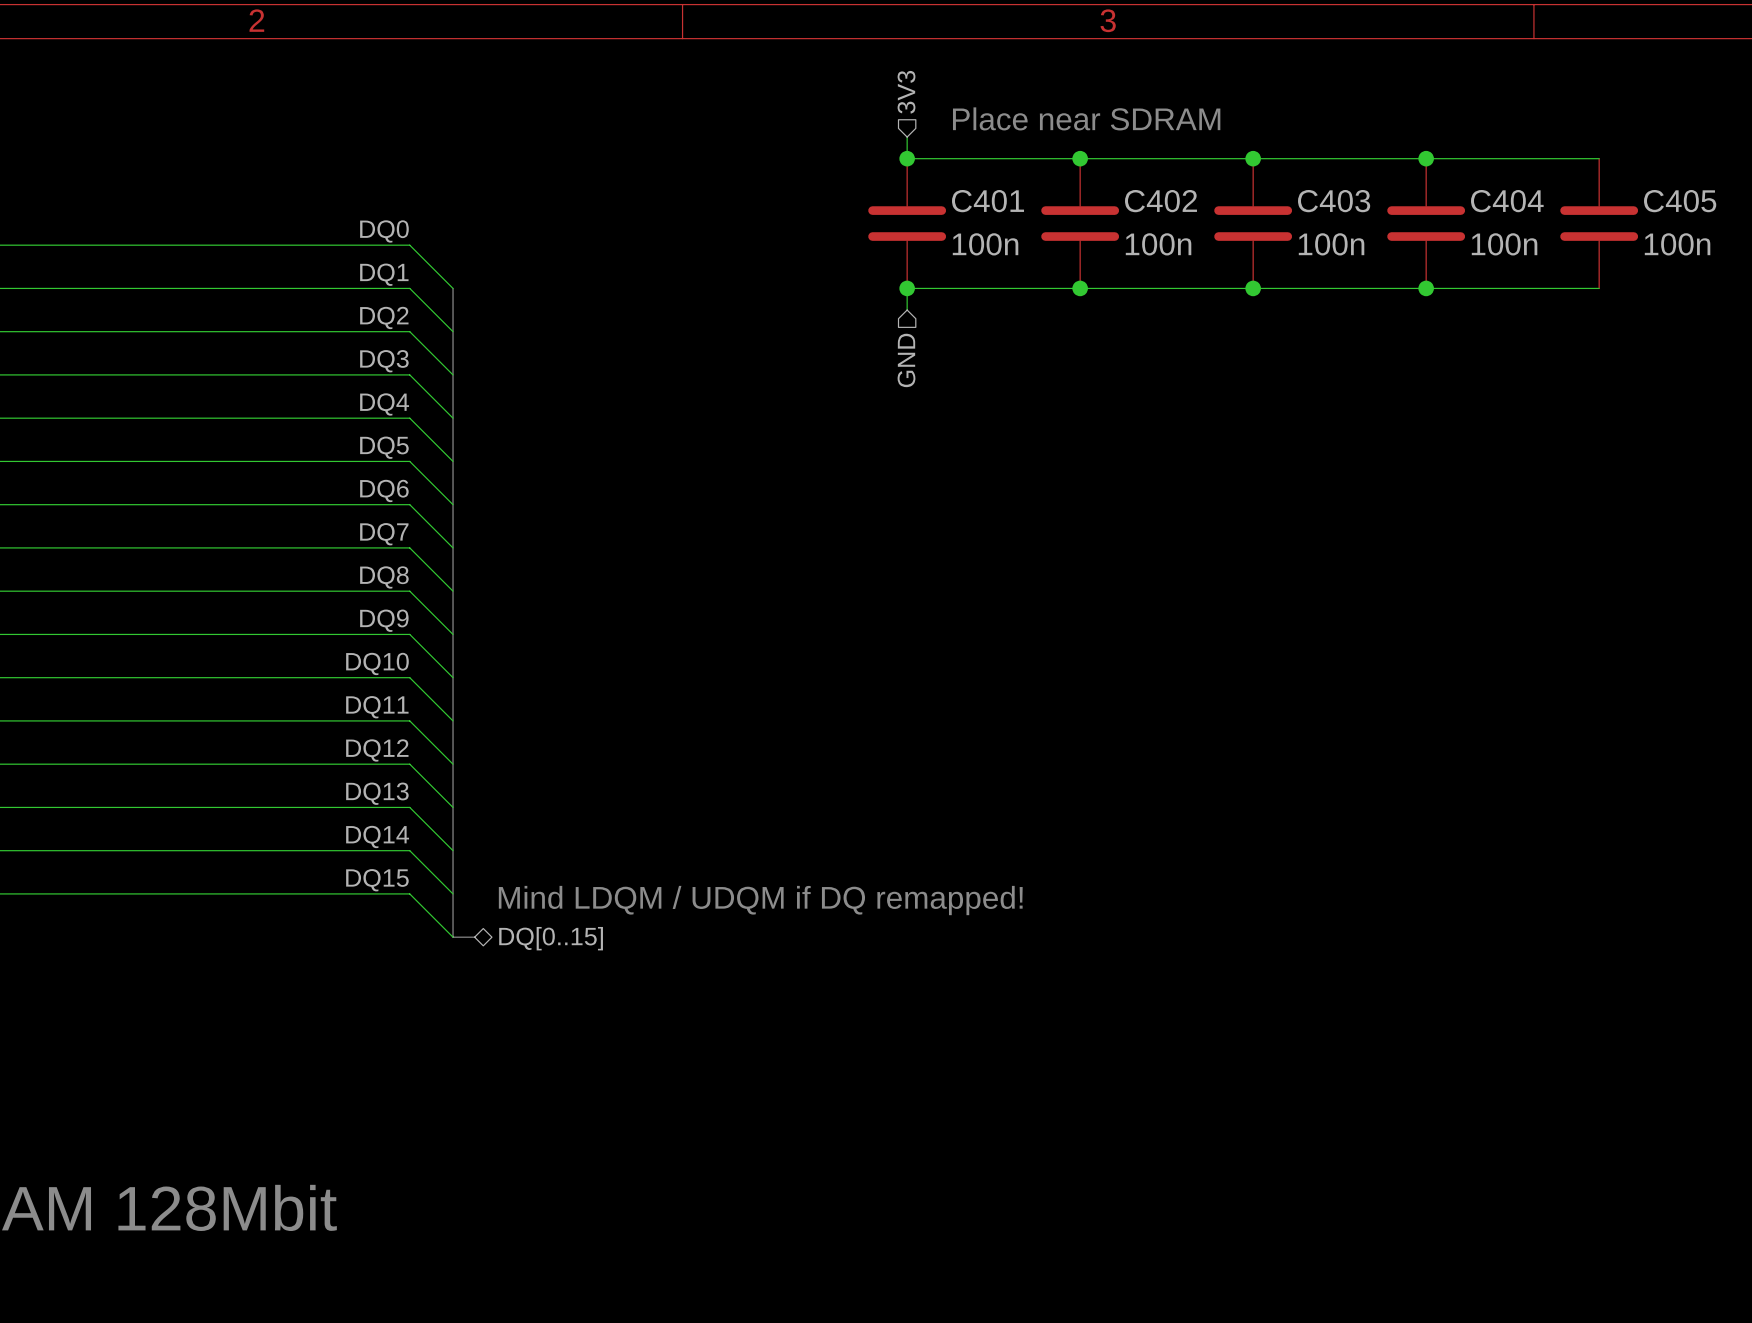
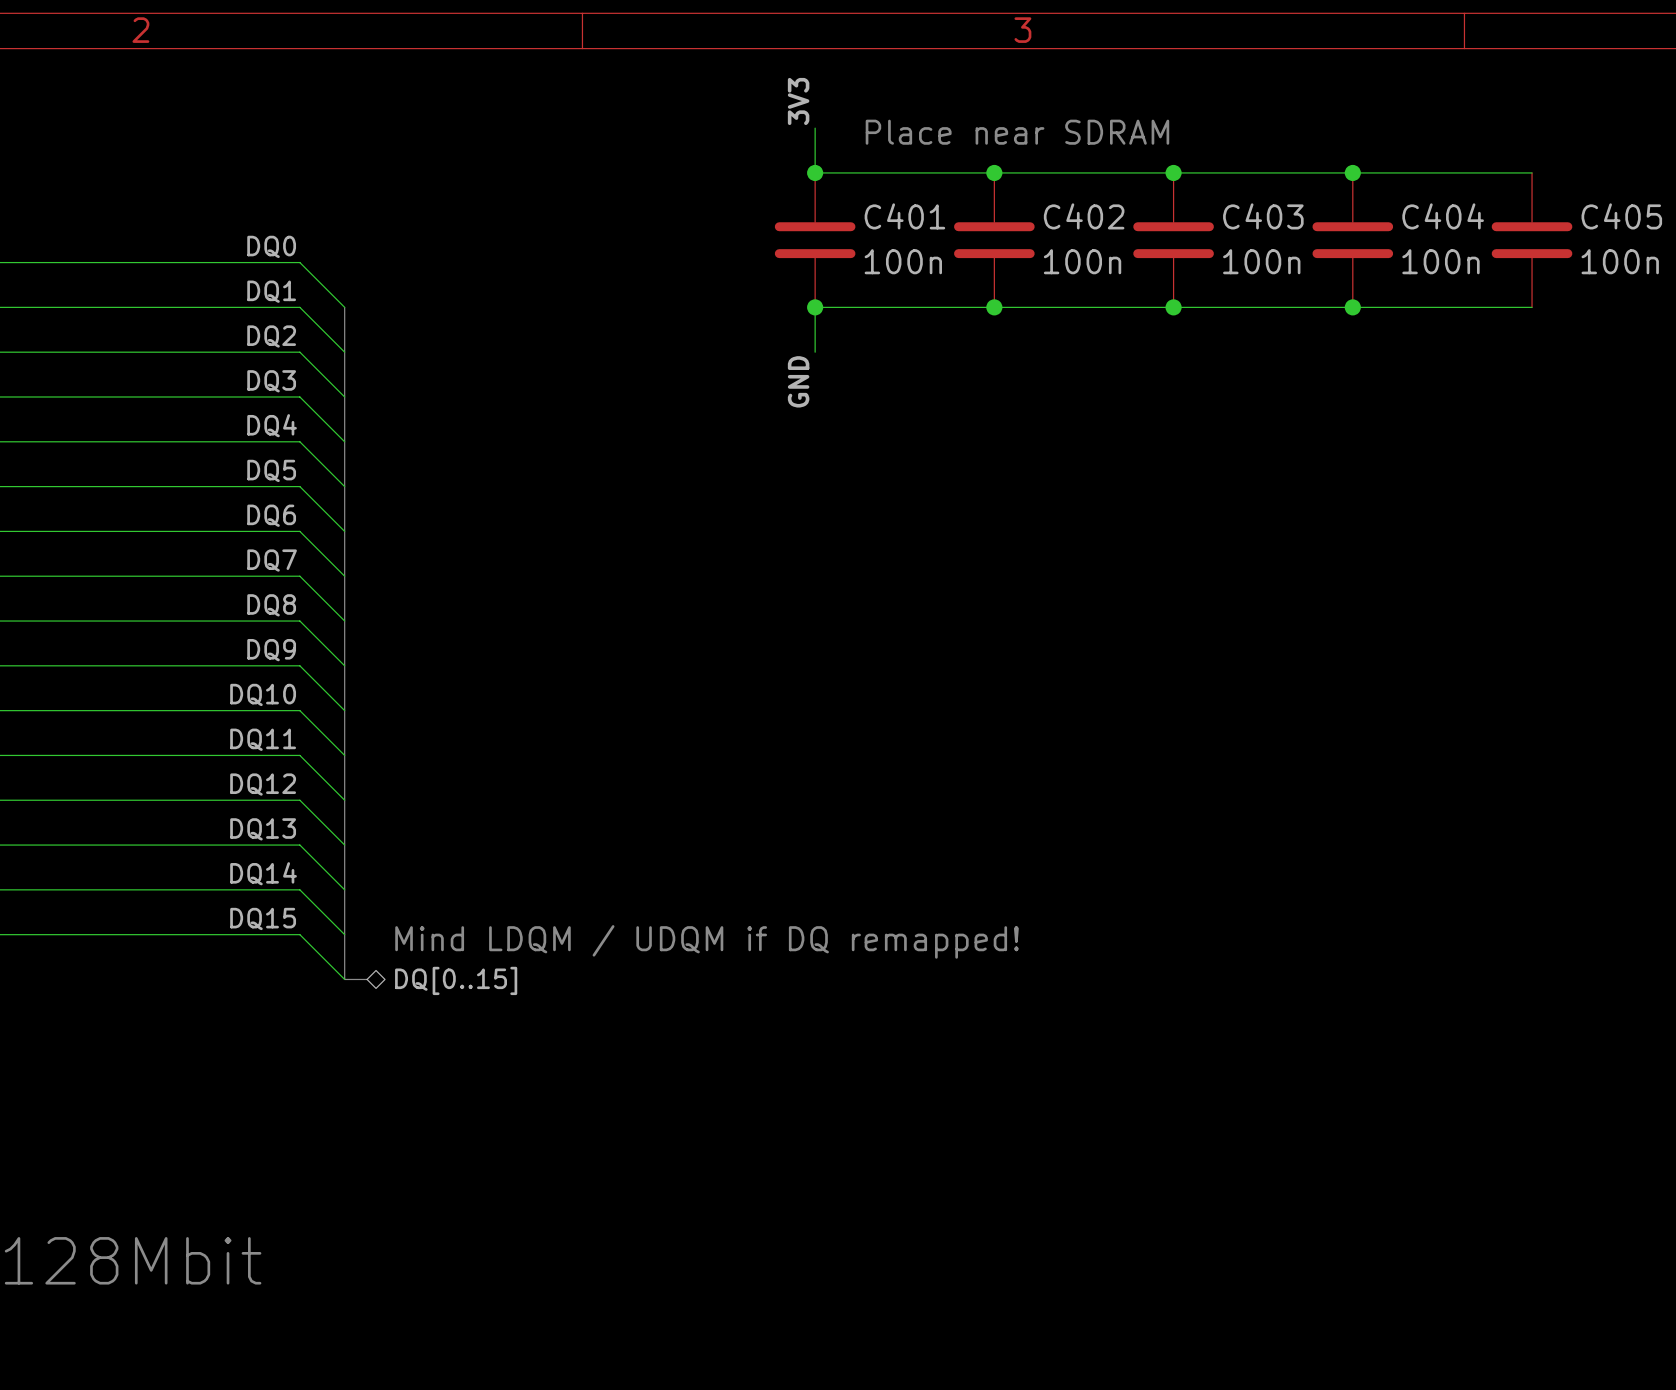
hierarchical label: 3V3 (906, 92) -> none
label: none -> 3V3 (798, 101)
wire: none -> (815, 128) (815, 150)
wire: none -> (815, 329) (815, 352)
label: none -> GND (798, 381)
hierarchical label: GND (906, 360) -> none

